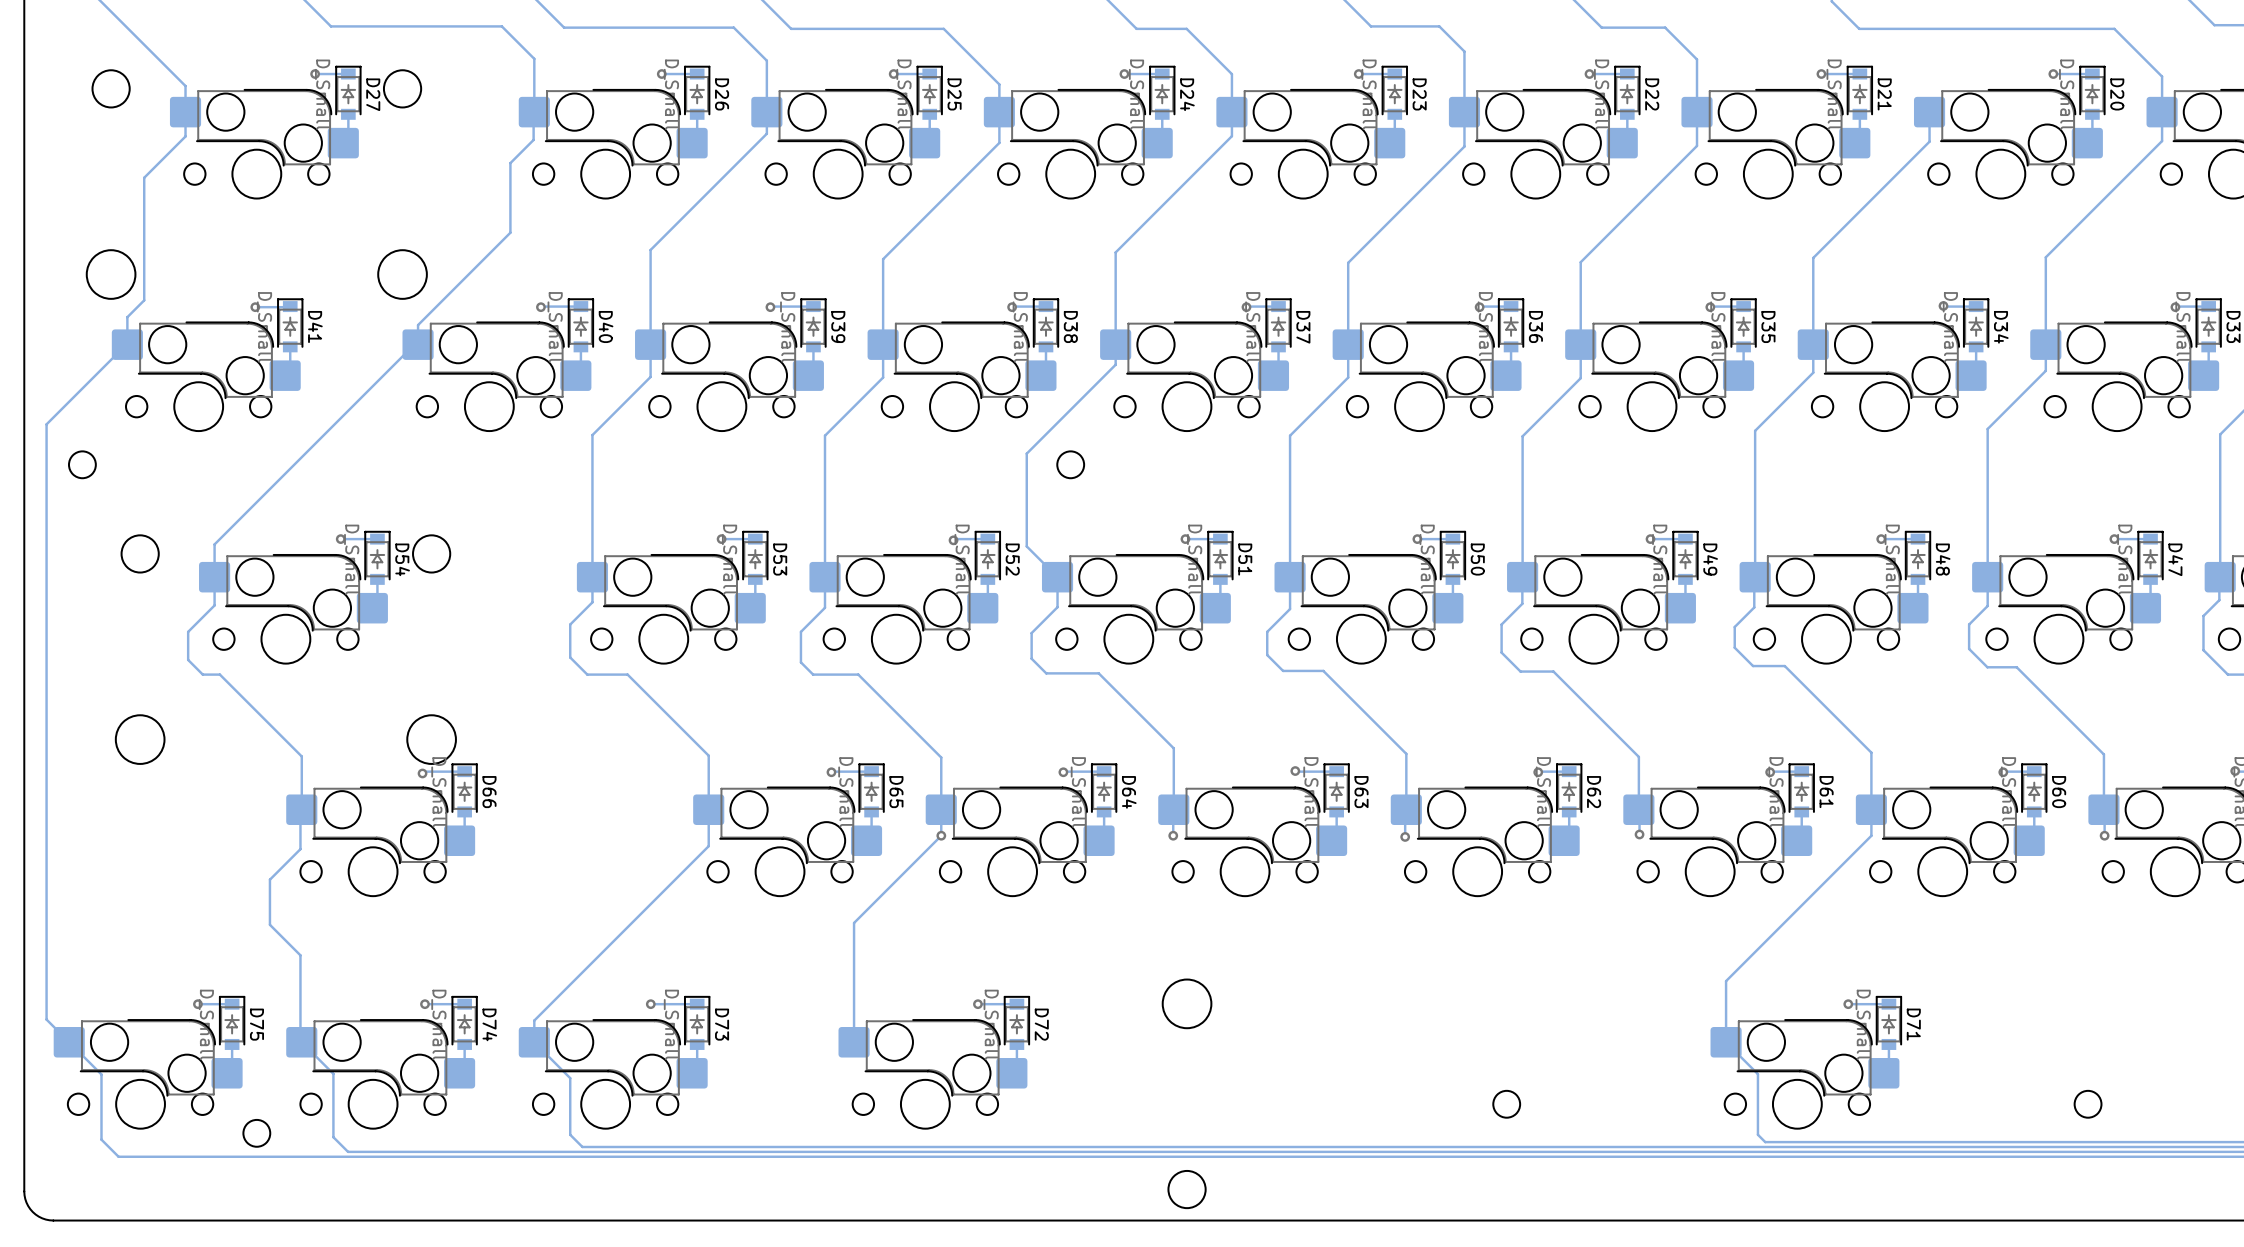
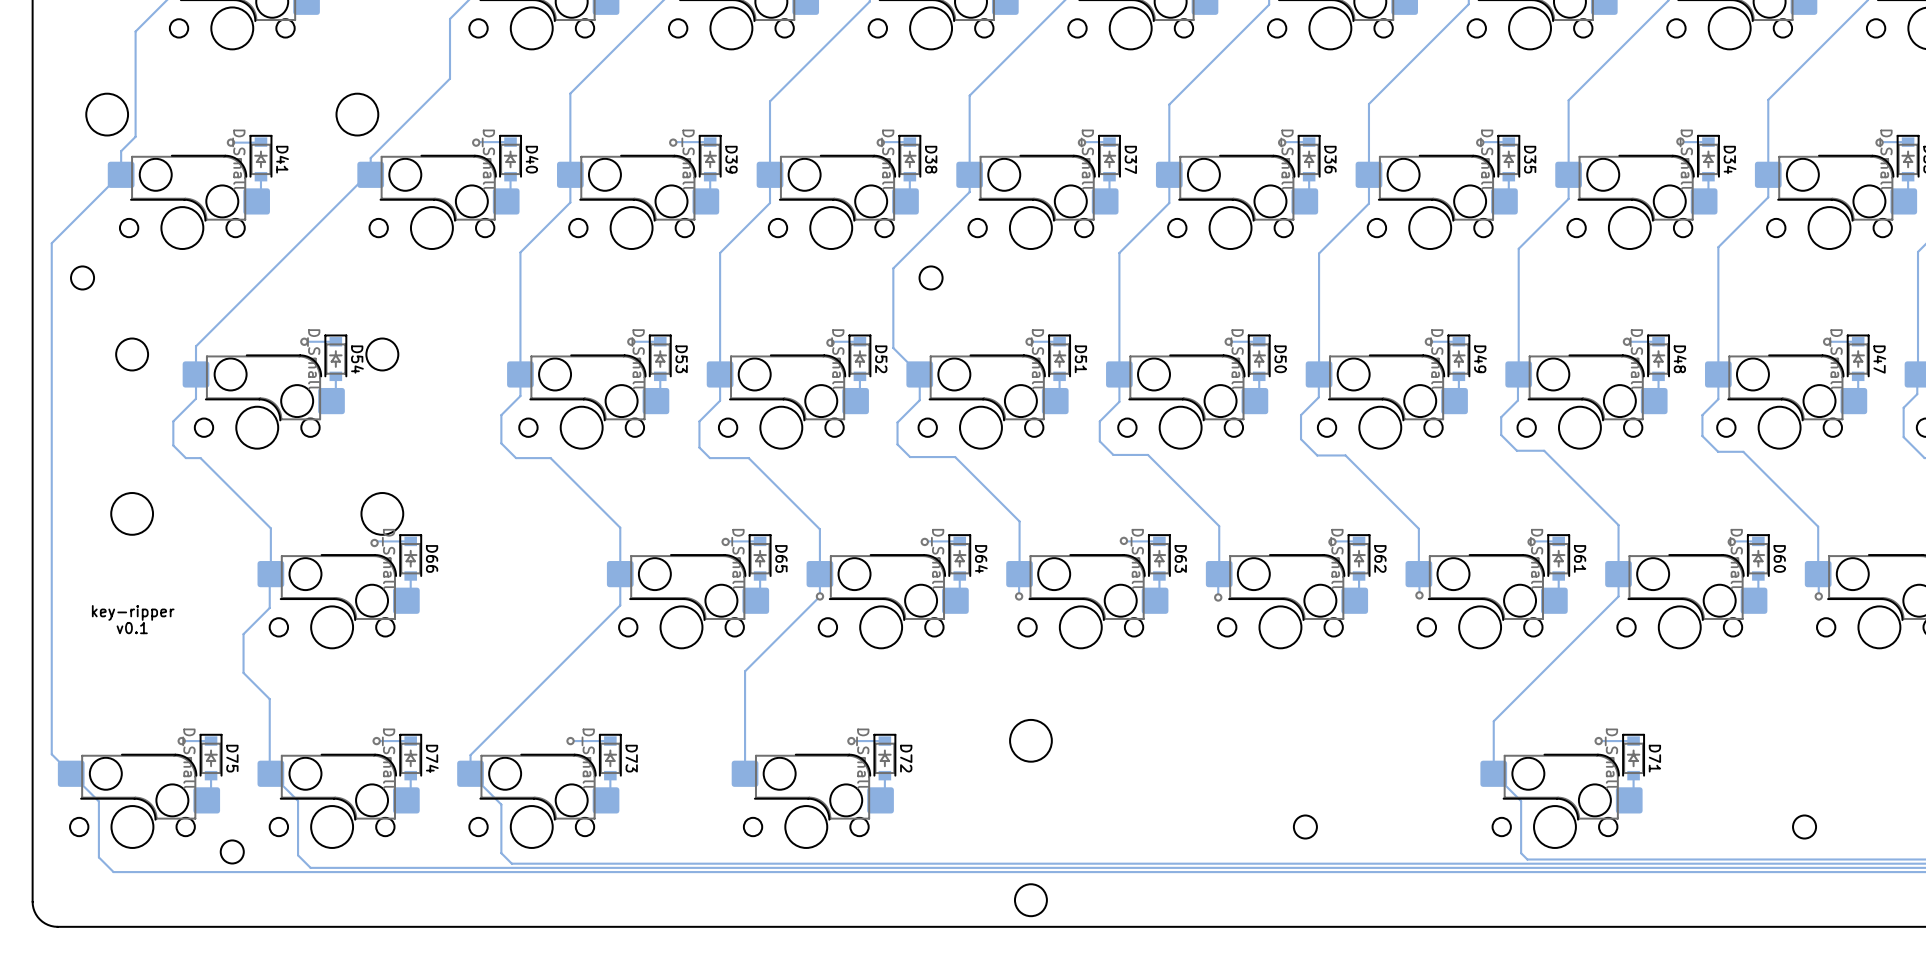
text: none -> key-ripper (133, 612)
text: none -> v0.1 (132, 628)

